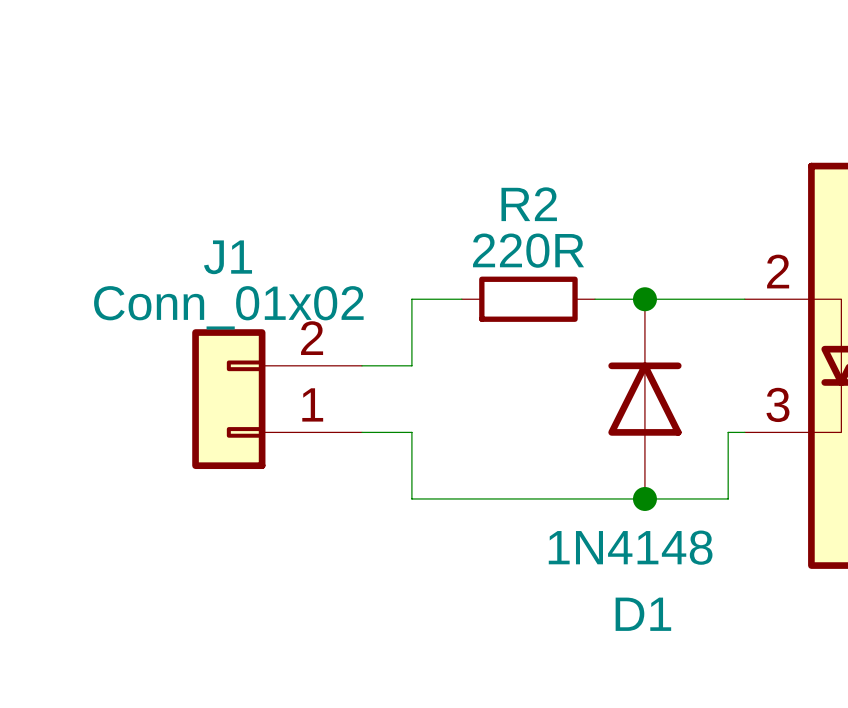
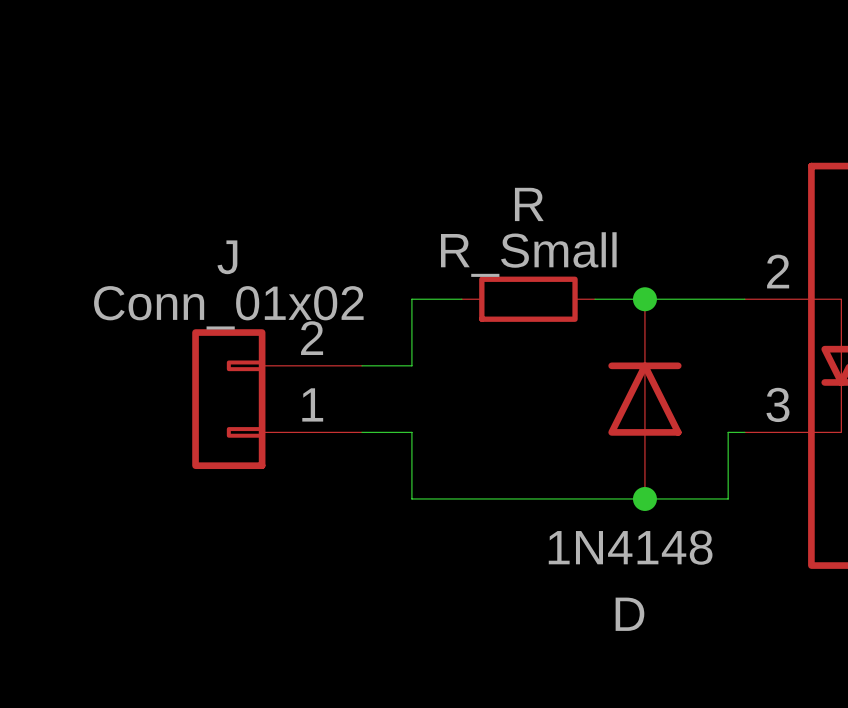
R2 name: R2 (529, 204) -> R (529, 204)
R2 value: 220R (528, 250) -> R_Small (528, 254)
J1 name: J1 (228, 257) -> J (227, 257)
D1 name: D1 (643, 614) -> D (629, 614)

